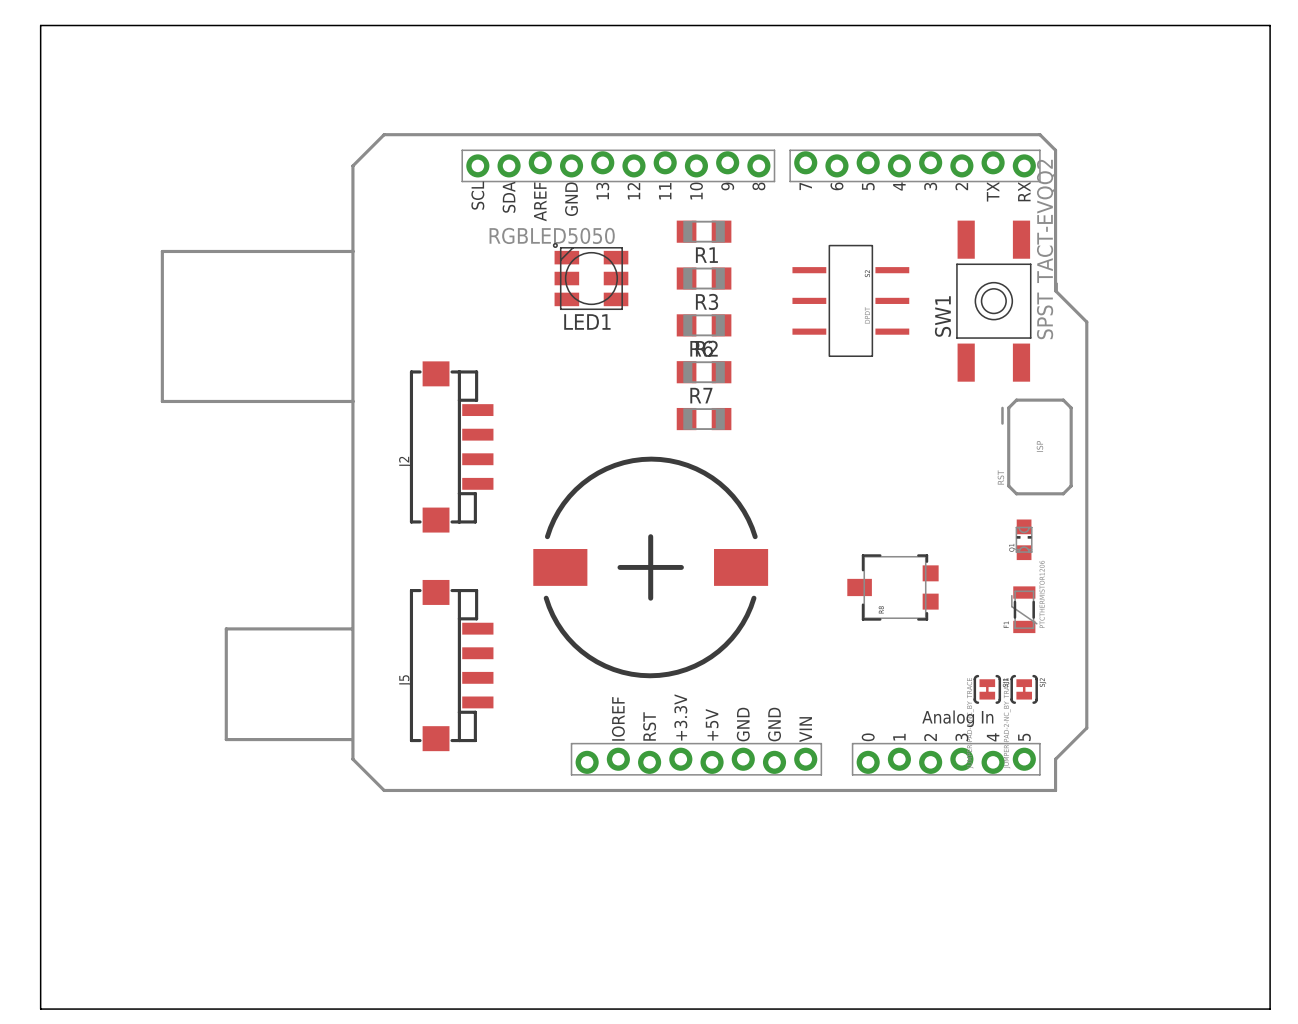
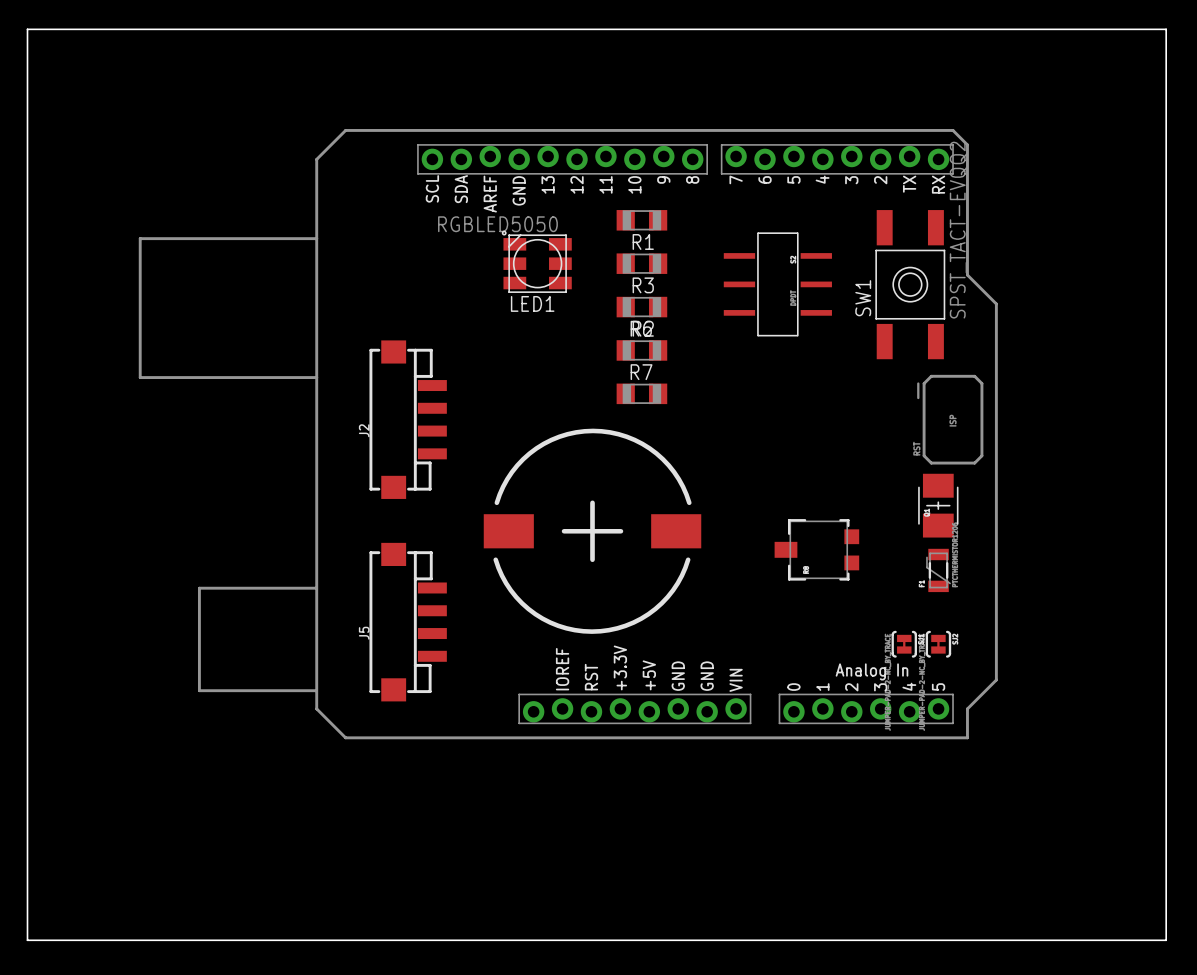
part footprint: [1015, 519, 1033, 561] -> [918, 473, 959, 538]

